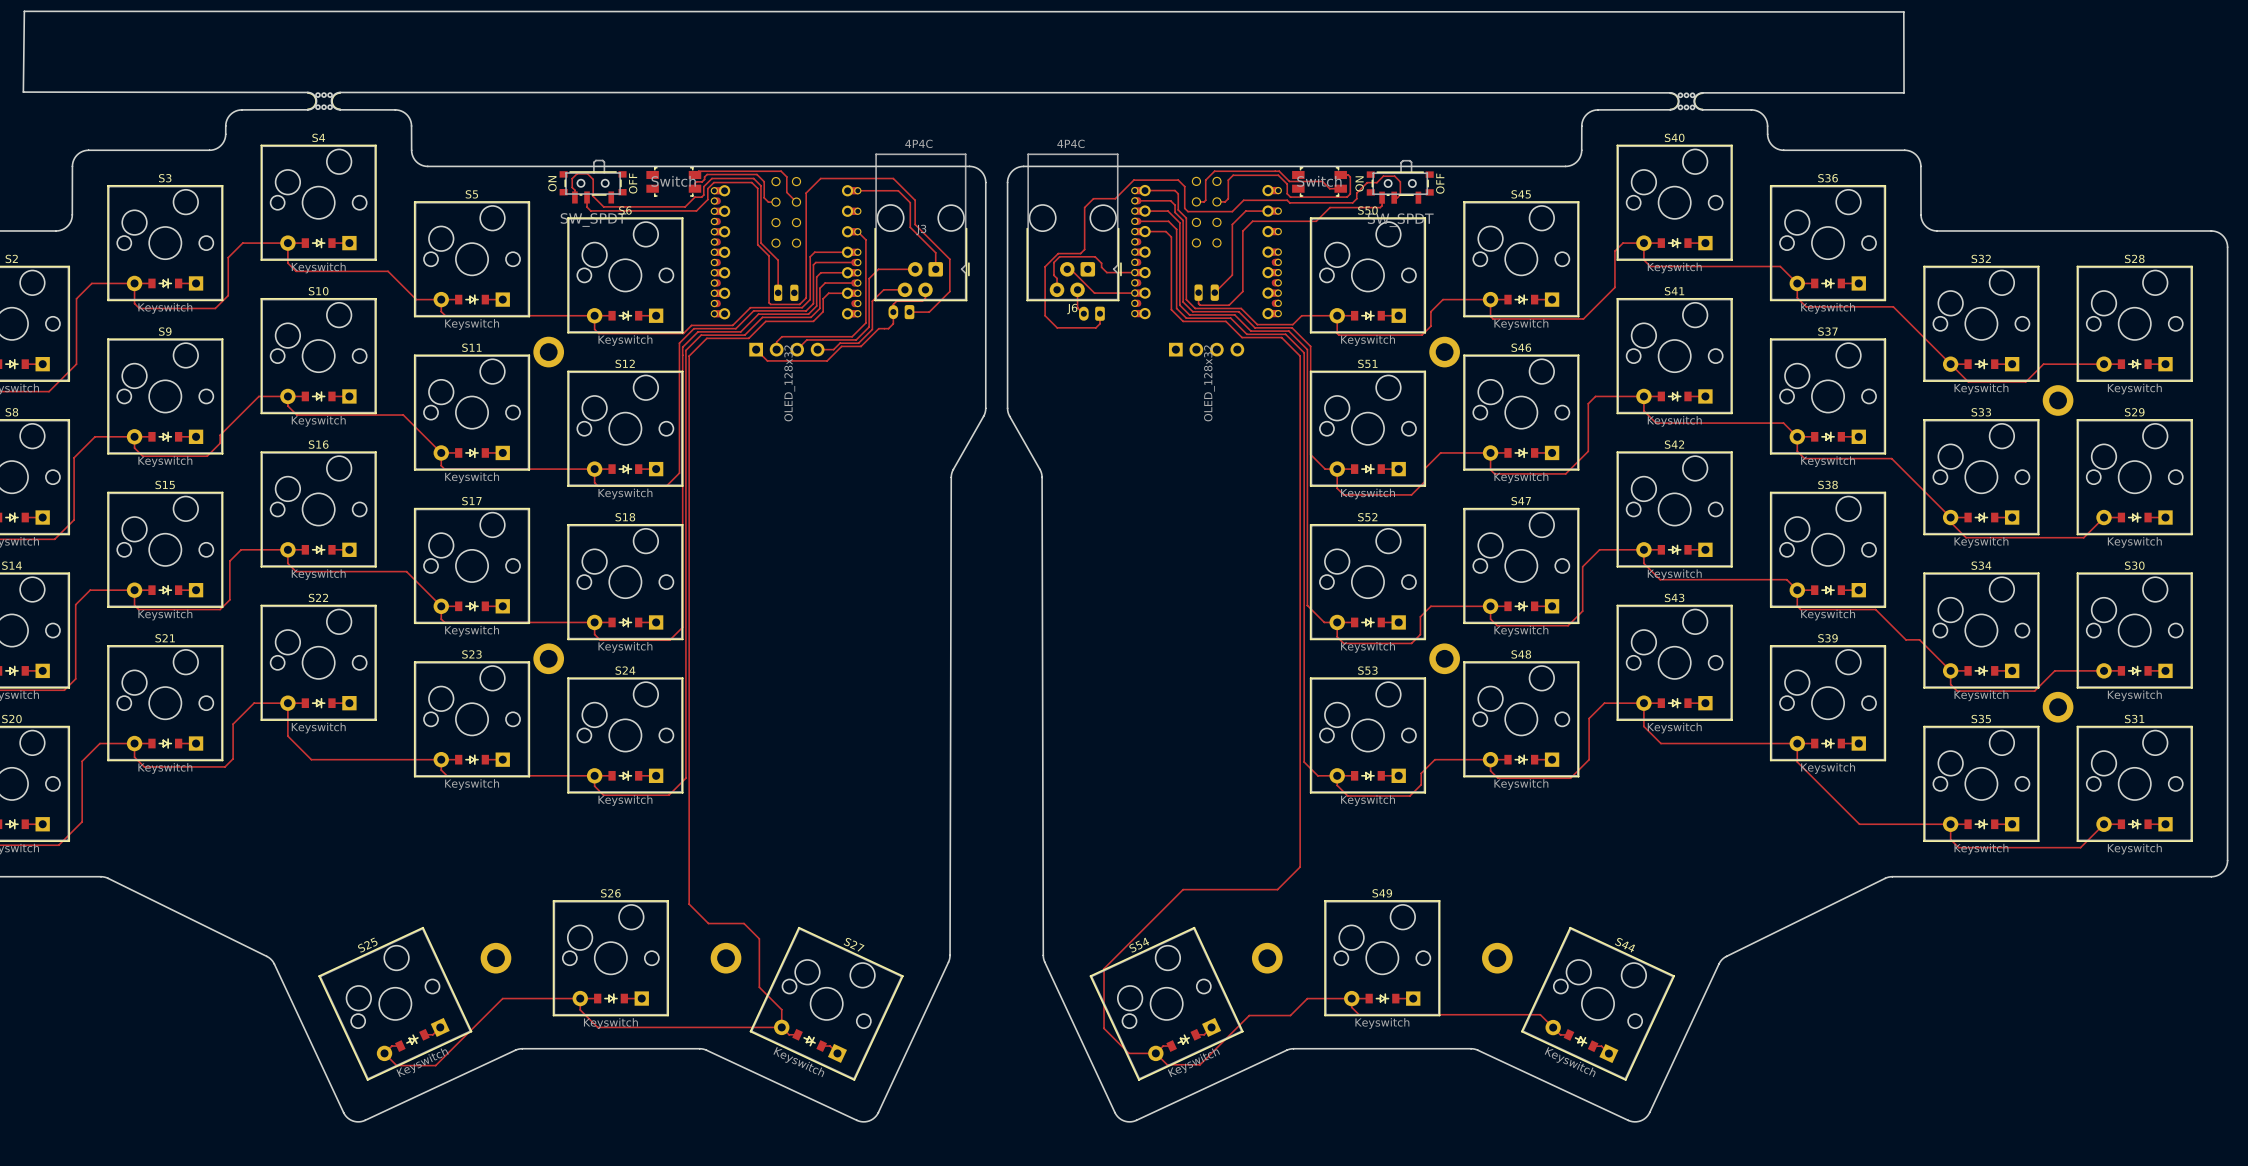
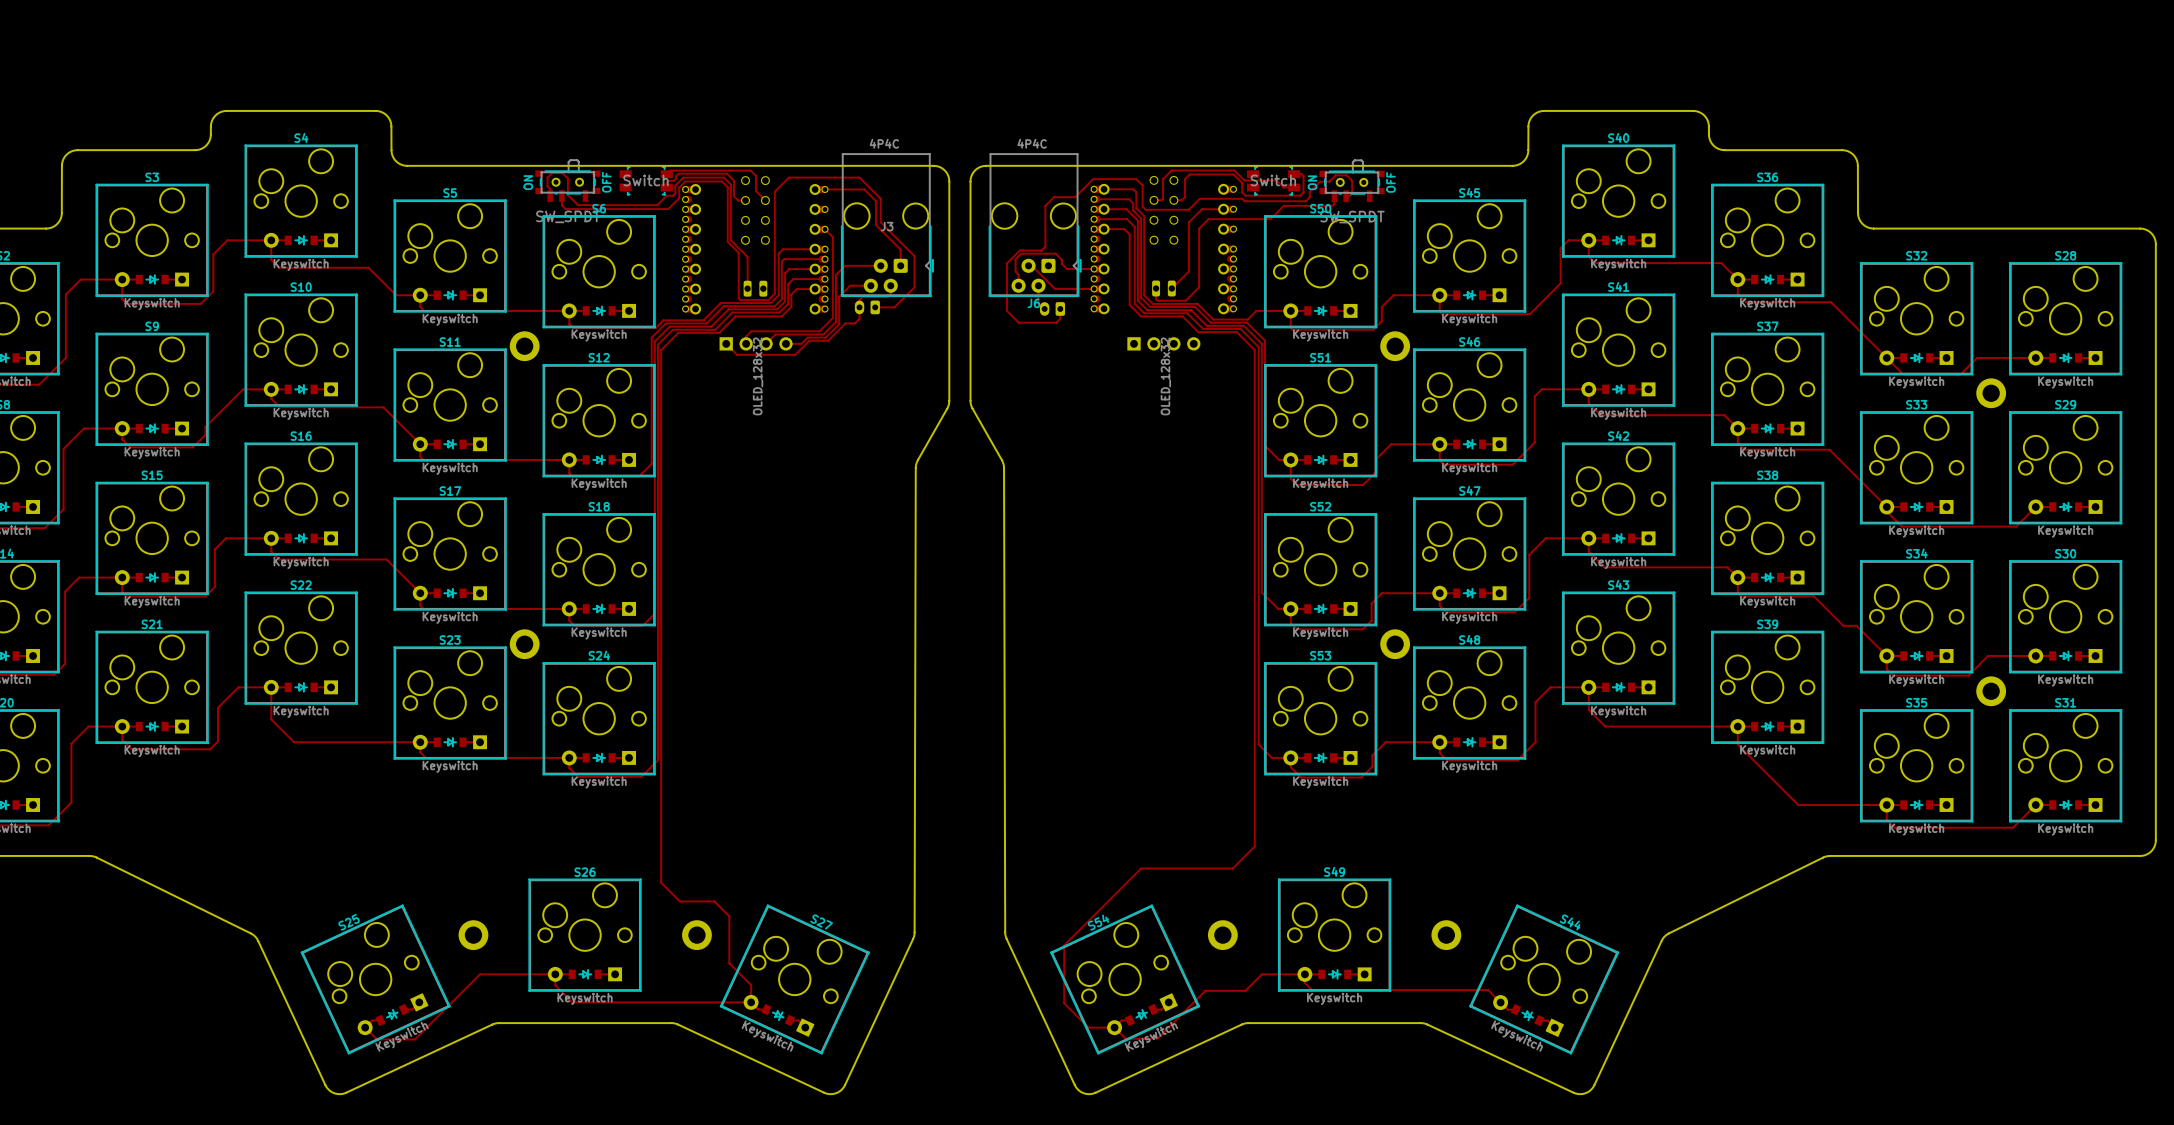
part: (324, 101) -> none
part: (1686, 101) -> none
board edge: (241, 109) (309, 109) (314, 106) (316, 100) (314, 95) (307, 92) (23, 92) (24, 11) (1903, 11) (1904, 92) (1702, 92) (1694, 98) (1694, 104) (1700, 109) (1756, 110) (1765, 117) (1767, 126) -> (1528, 126) (1533, 115) (1544, 110) (1695, 111) (1704, 115) (1708, 126)
board edge: (395, 109) (339, 109) (333, 106) (331, 100) (334, 94) (340, 92) (1670, 92) (1675, 94) (1678, 99) (1677, 106) (1671, 109) (1593, 110) (1585, 116) (1581, 126) -> (375, 110) (226, 110)

